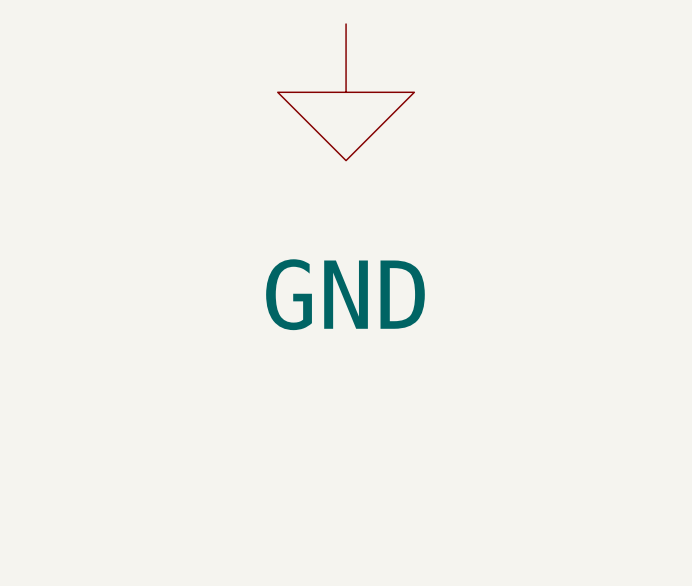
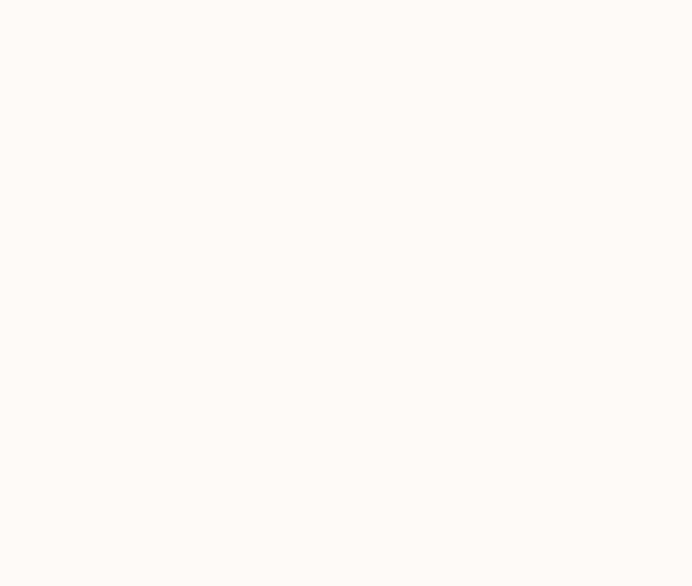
power symbol: GND (346, 92) -> none

